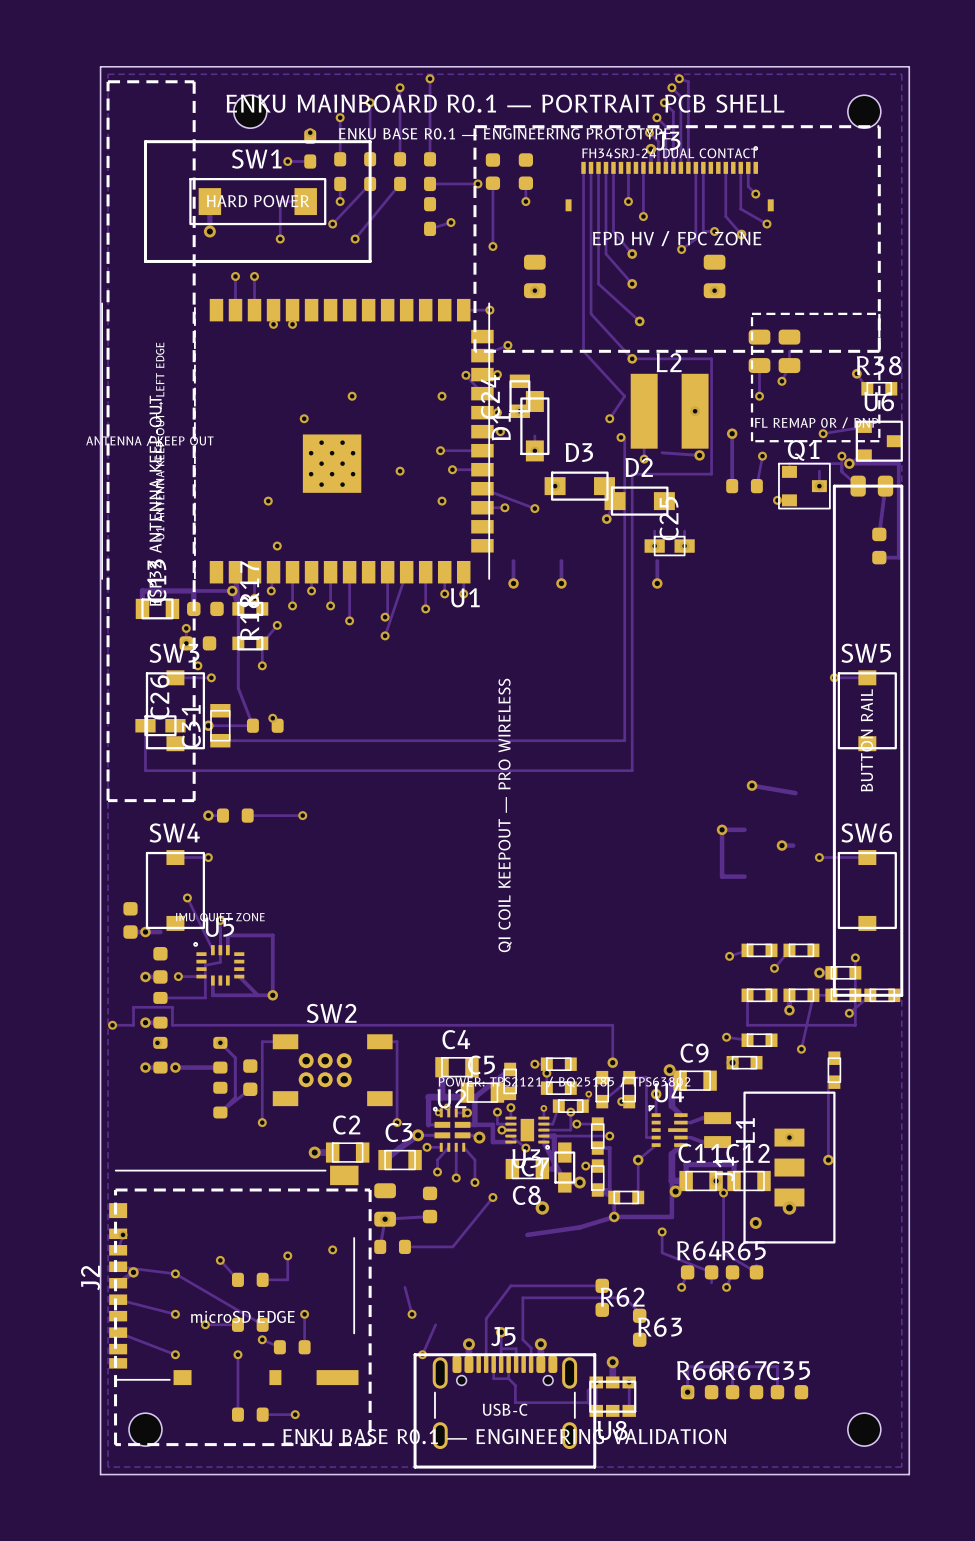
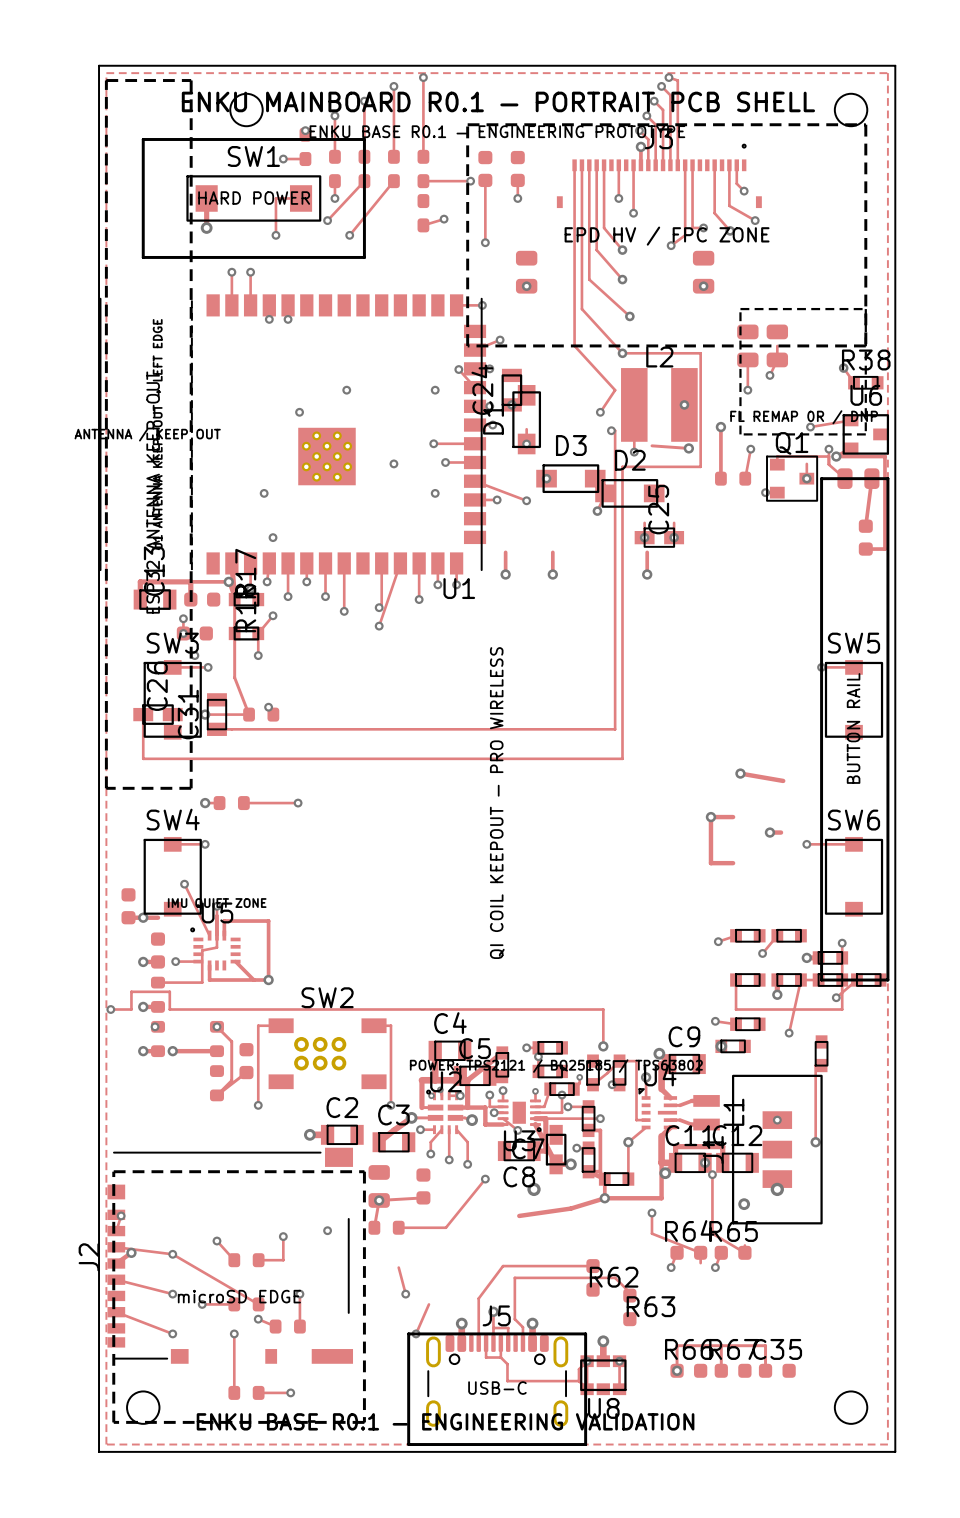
text: FH34SRJ-24 DUAL CONTACT (669, 153) -> none
text position: ENKU BASE R0.1 — ENGINEERING VALIDATION (504, 1436) -> ENKU BASE R0.1 — ENGINEERING VALIDATION (445, 1421)

